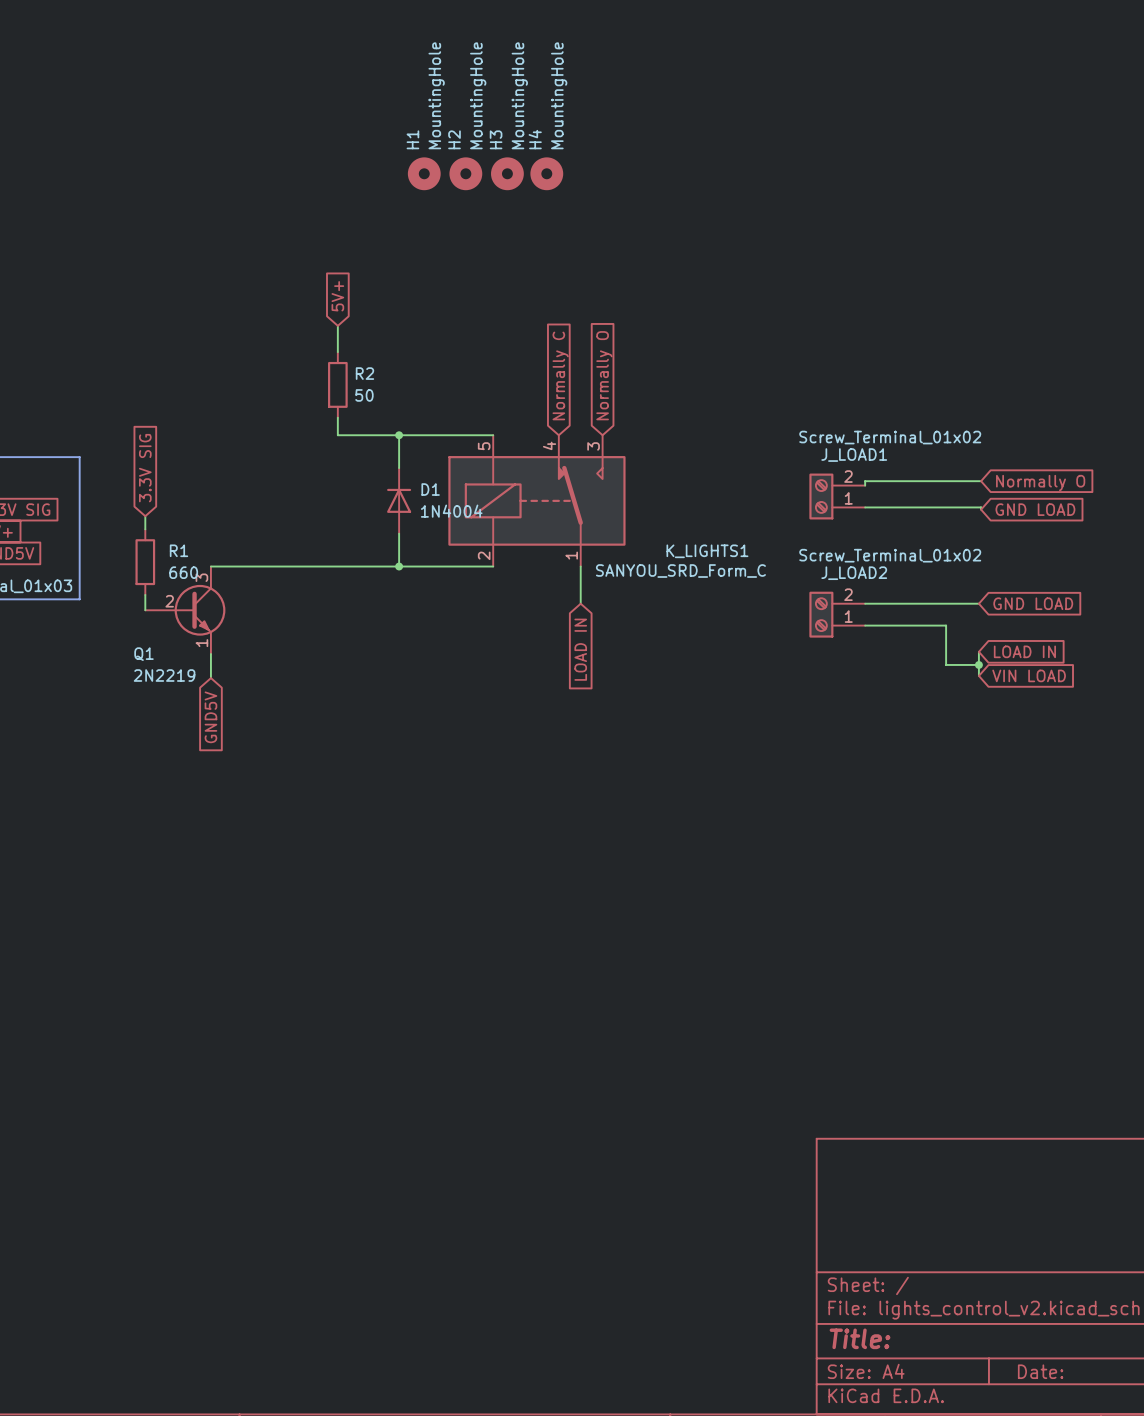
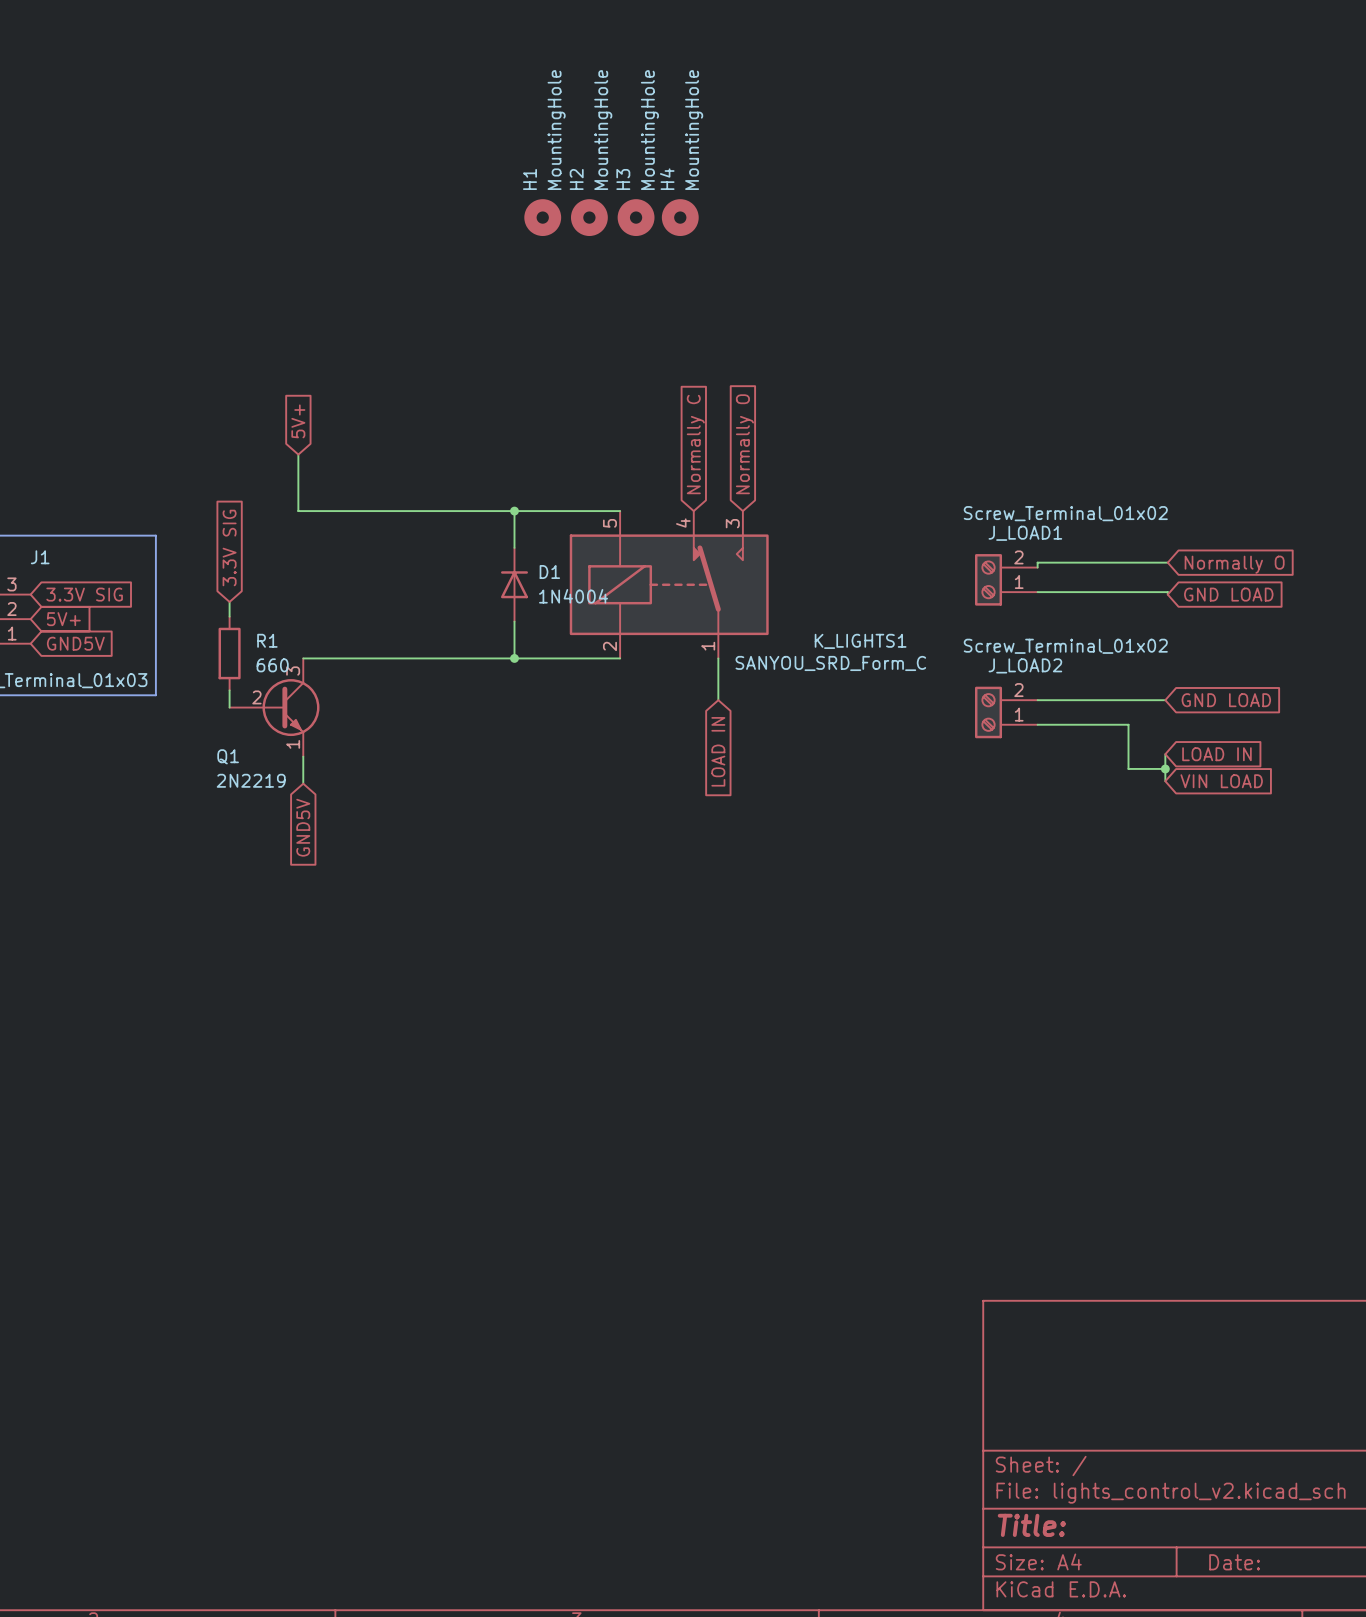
global label position: 5V+ (337, 296) -> 5V+ (298, 421)
wire: (337, 325) (337, 352) -> none
R2: 50 (337, 384) -> none
wire: (337, 417) (337, 435) -> (298, 454) (298, 511) (445, 511)

